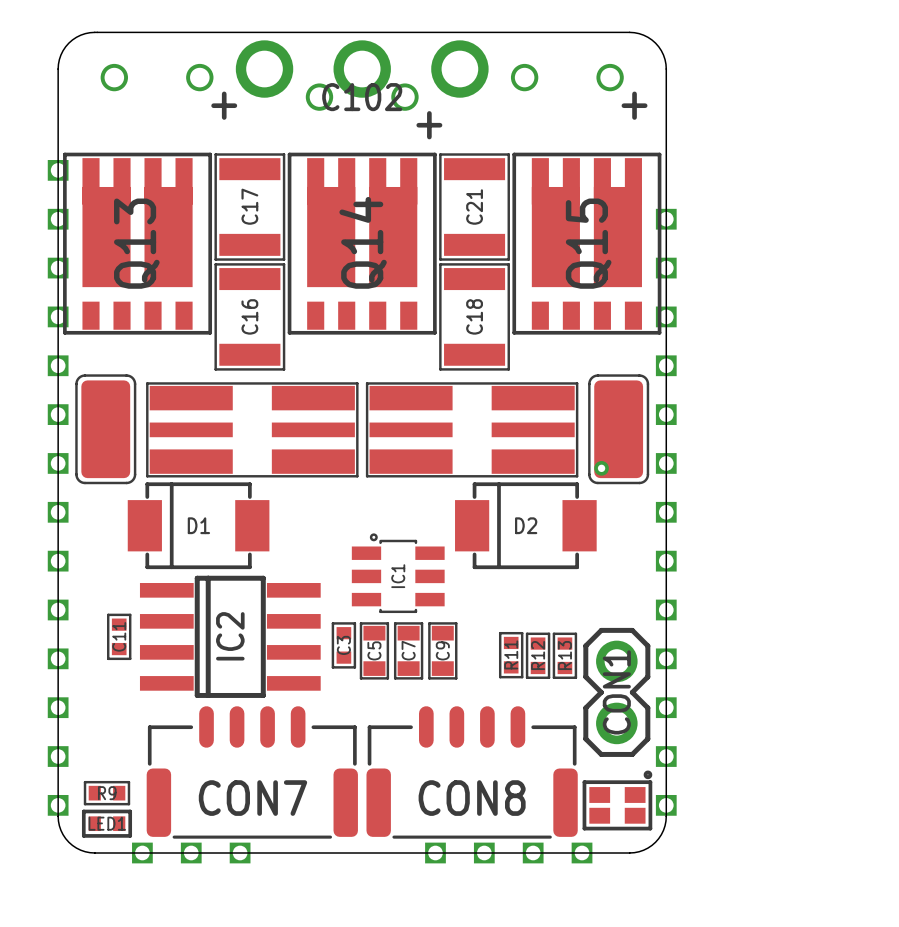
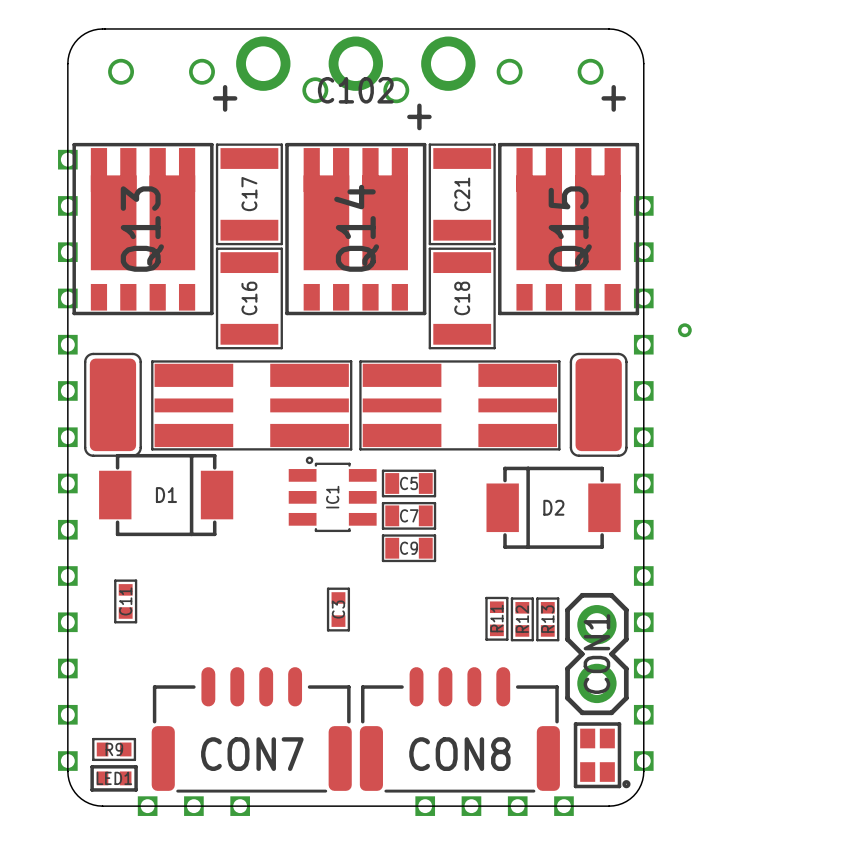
part position: (601, 468) -> (684, 330)
D1 rotation: 0° (198, 525) -> 180° (166, 495)
D2 position: (525, 525) -> (553, 507)
IC1 position: (398, 573) -> (332, 494)
IC2: (230, 636) -> none
C5 rotation: 0° (374, 650) -> 90° clockwise (409, 483)
C5 position: (374, 650) -> (409, 483)
C7 rotation: 0° (408, 650) -> 90° clockwise (409, 515)
C7 position: (408, 650) -> (409, 515)
C9 rotation: 0° (442, 650) -> 90° clockwise (409, 548)
C9 position: (442, 650) -> (409, 548)
part rotation: 0° (617, 800) -> 90° clockwise (602, 755)

